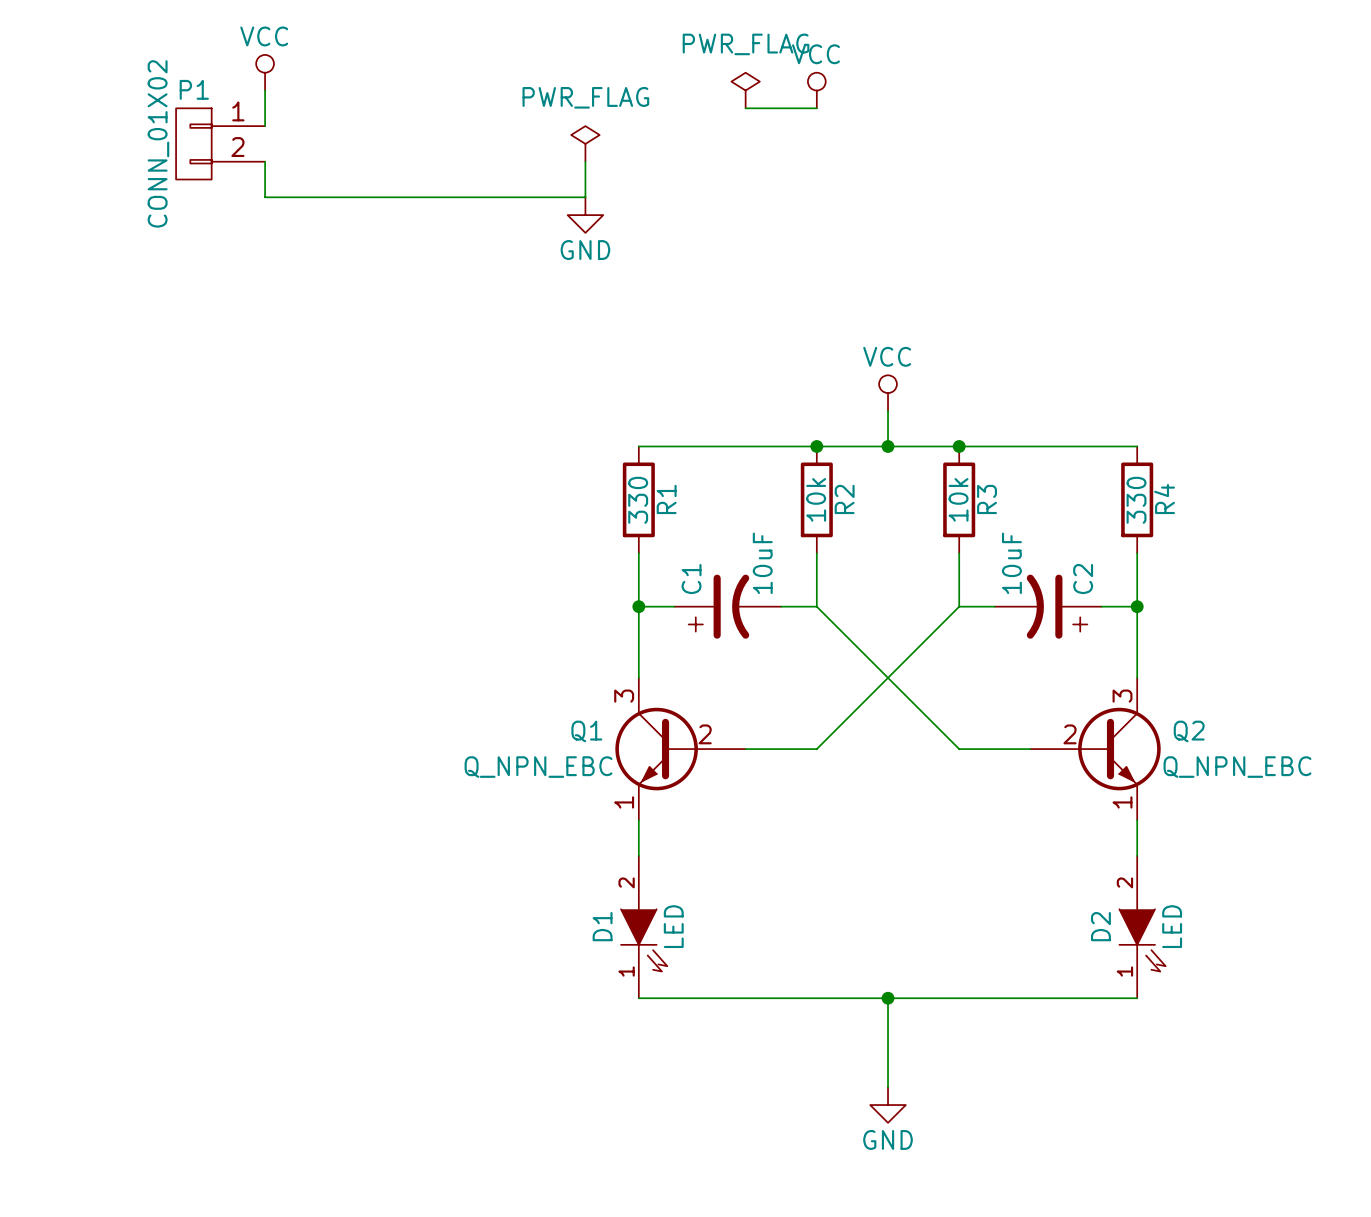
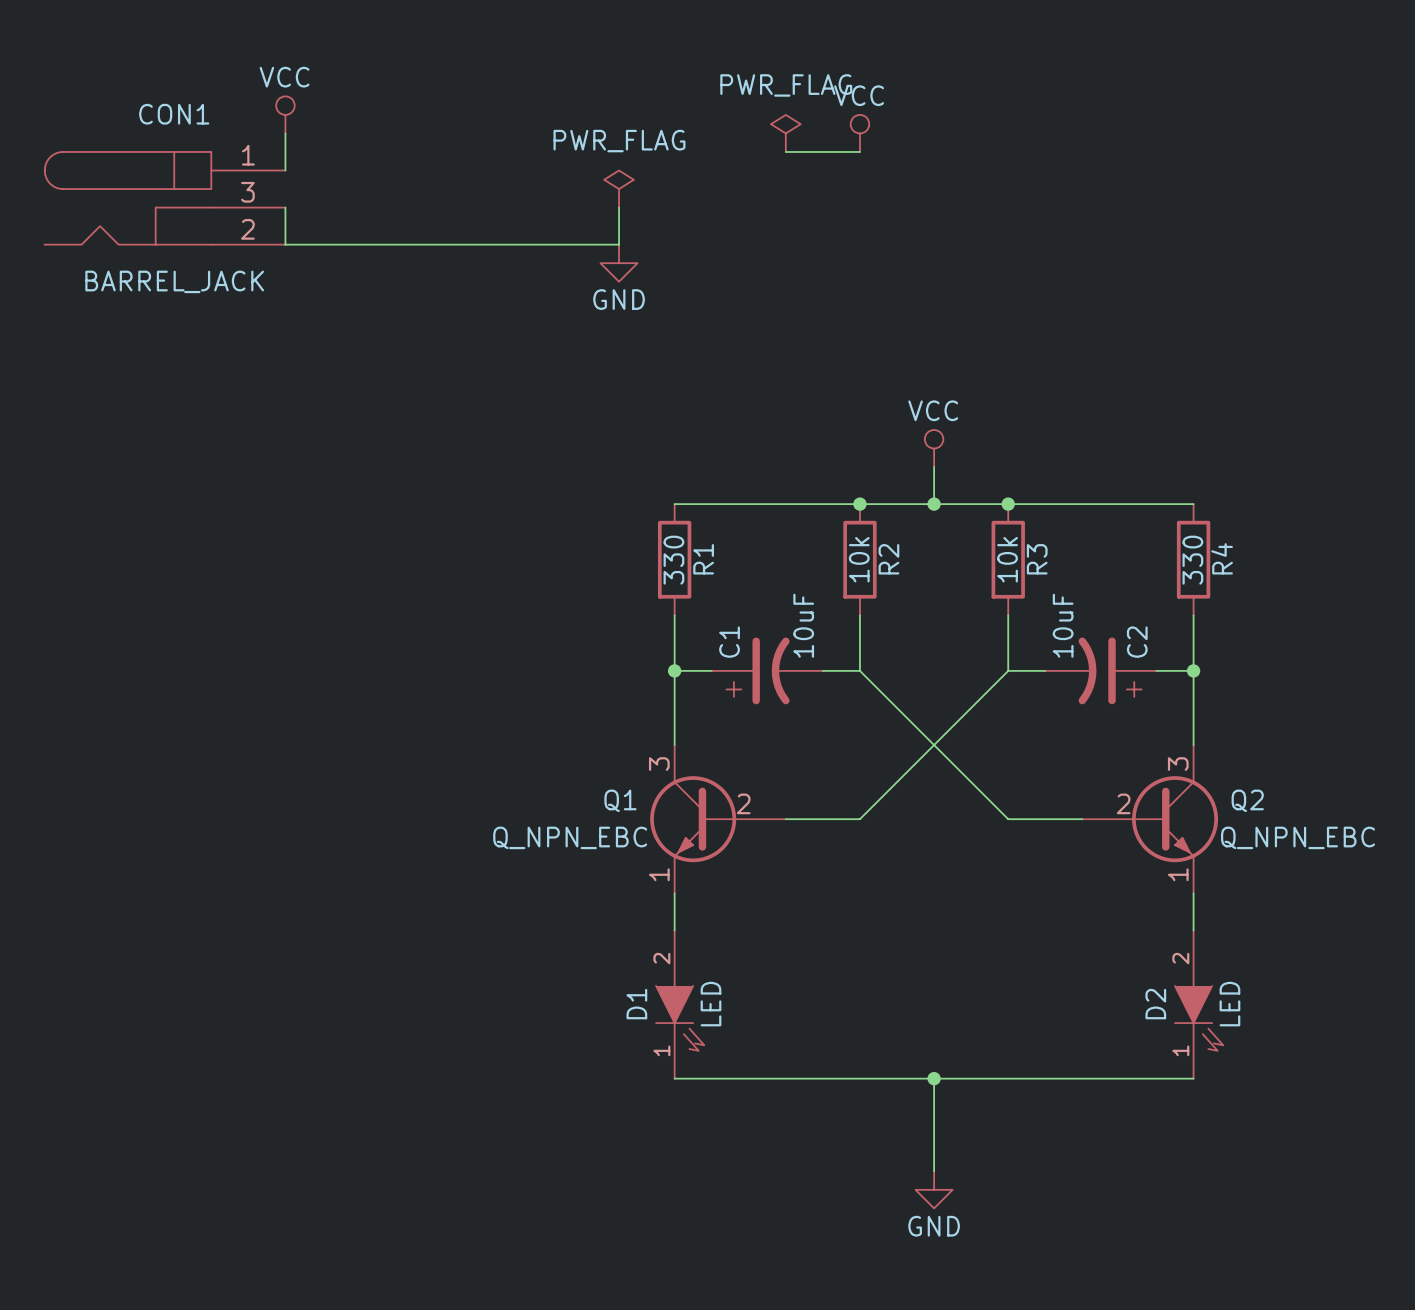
P1: CONN_01X02 (220, 143) -> none
CON1: none -> BARREL_JACK (164, 198)

